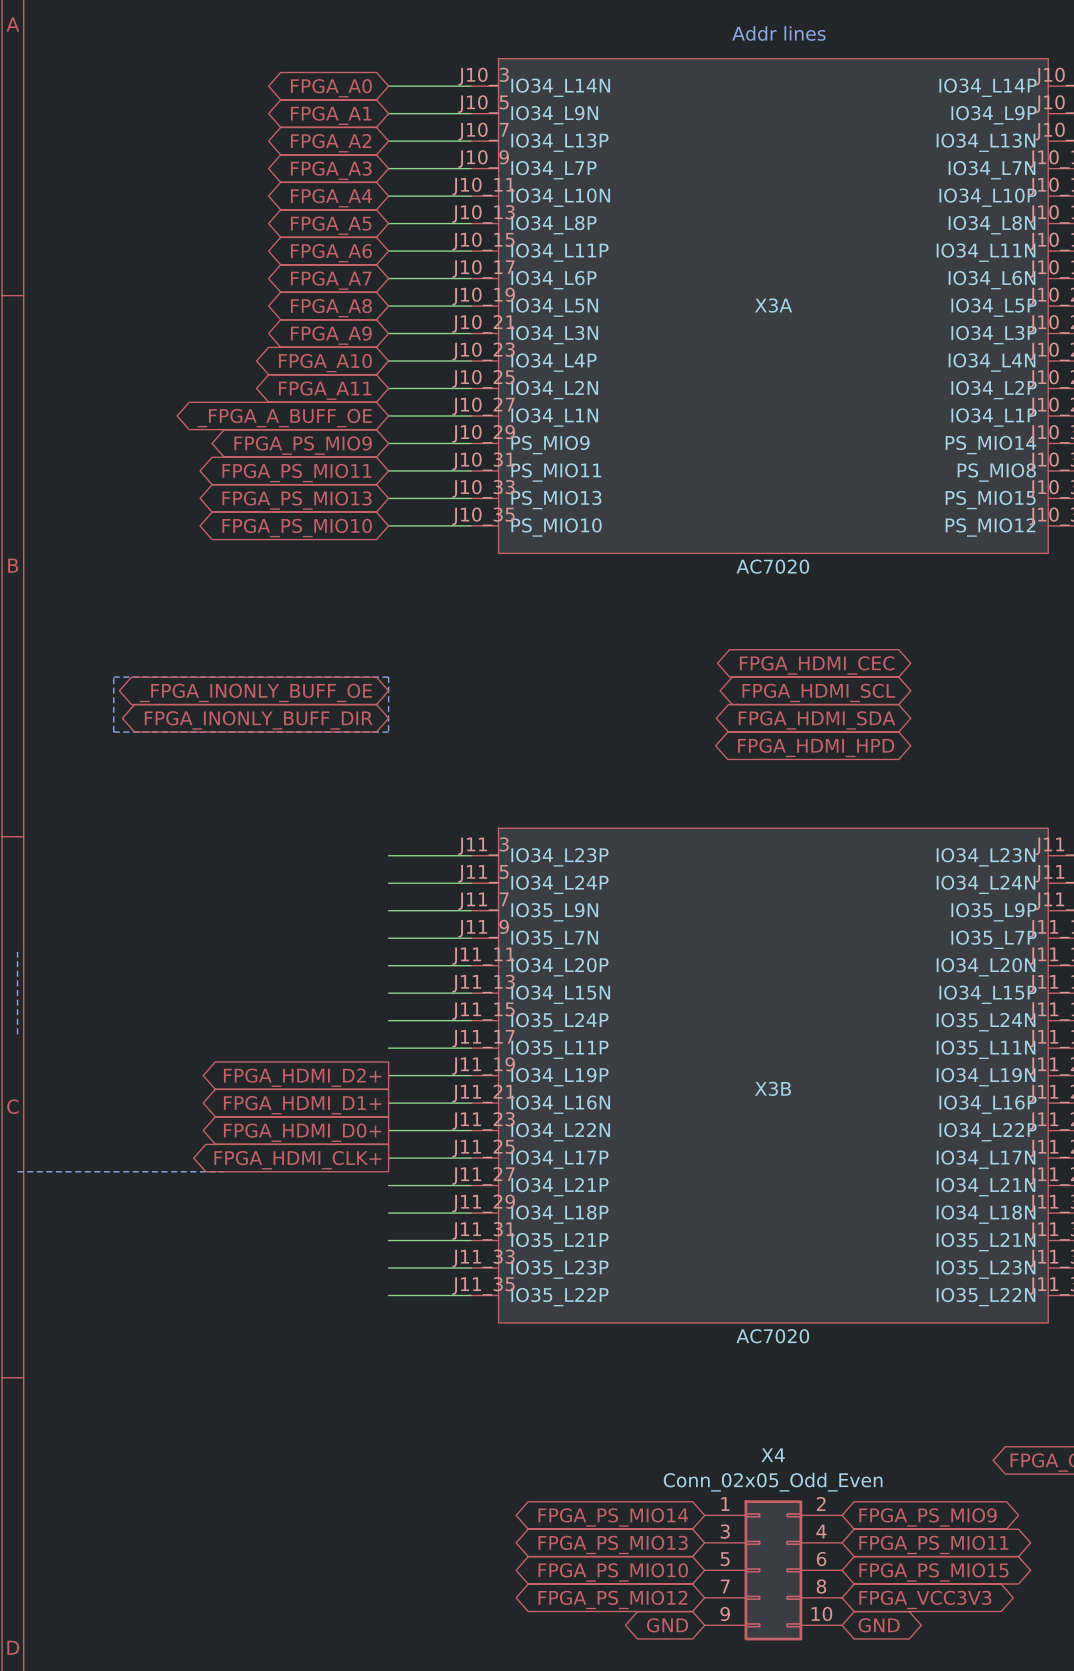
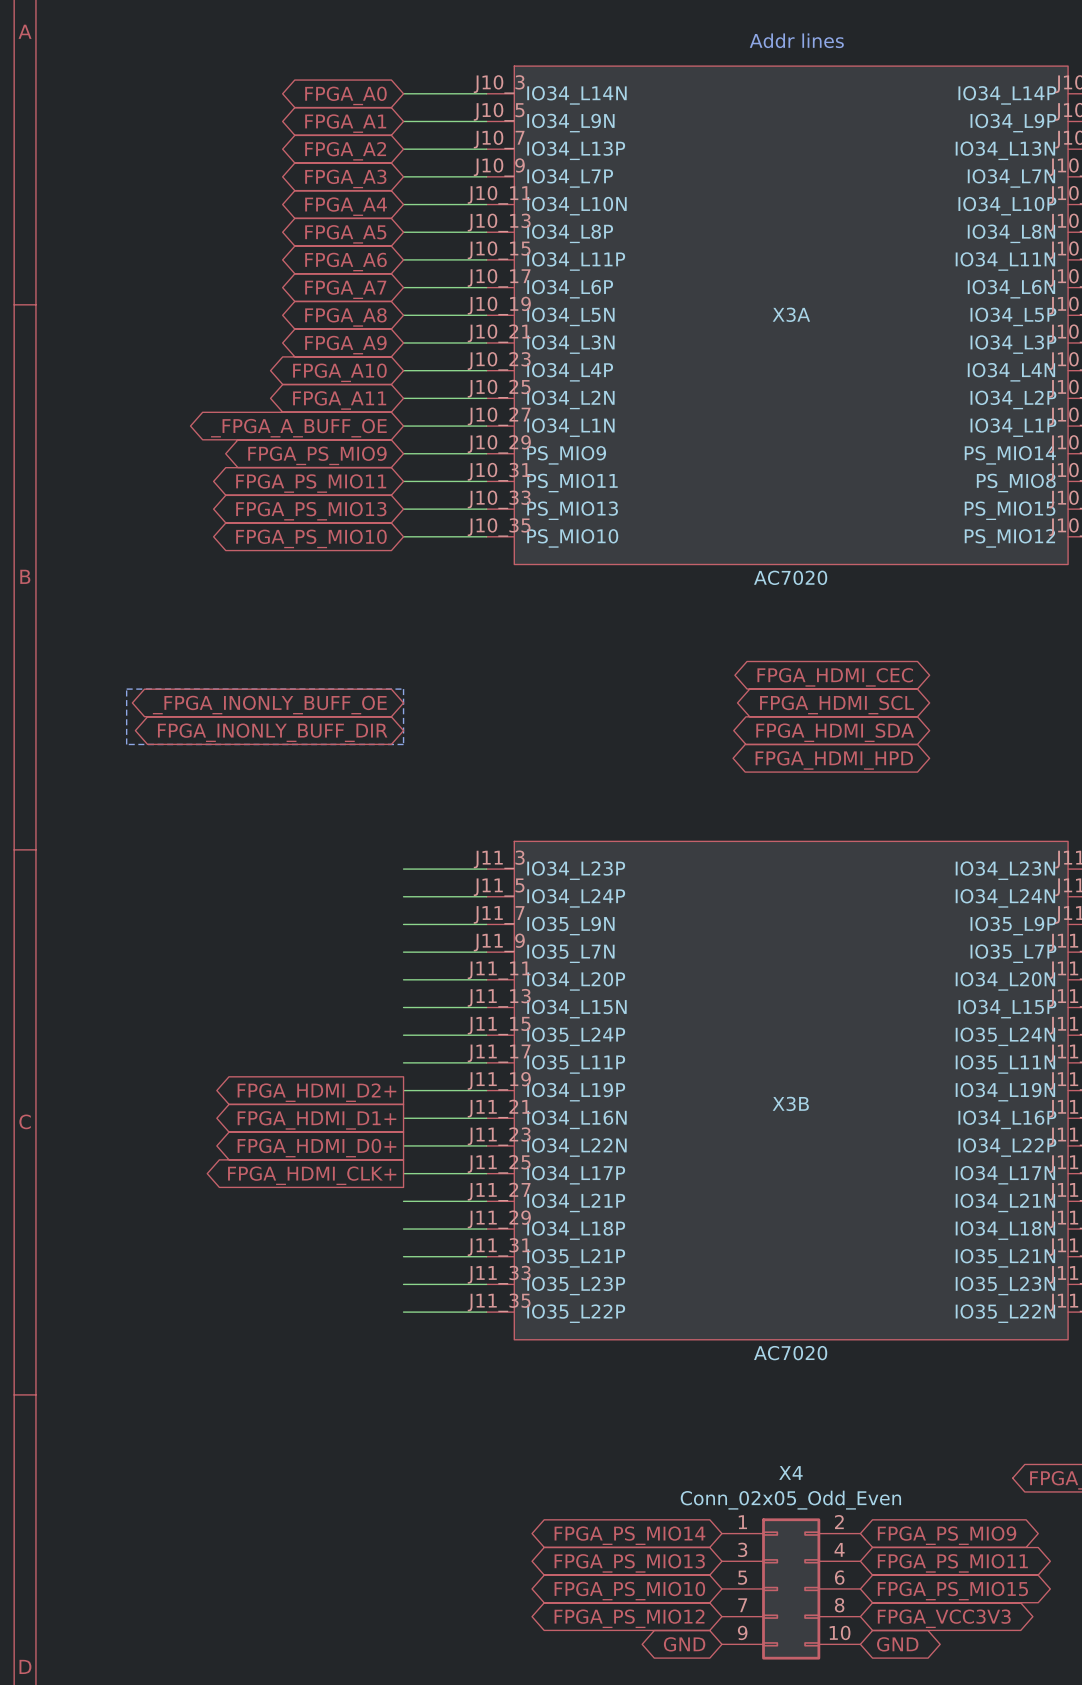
line: (17, 951) (17, 1034) -> none
line: (17, 1171) (223, 1171) -> none

